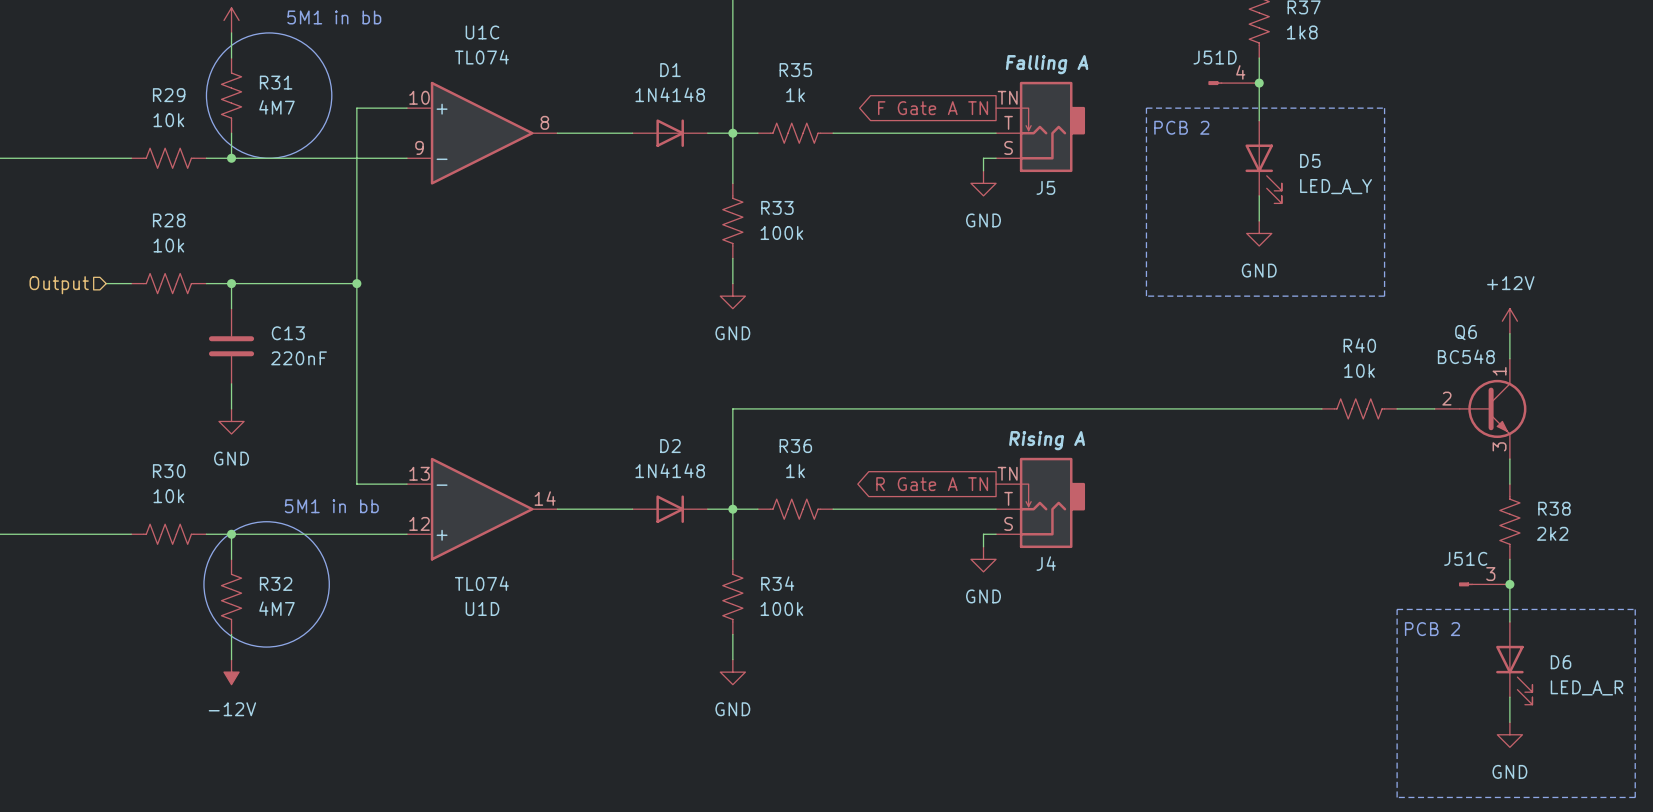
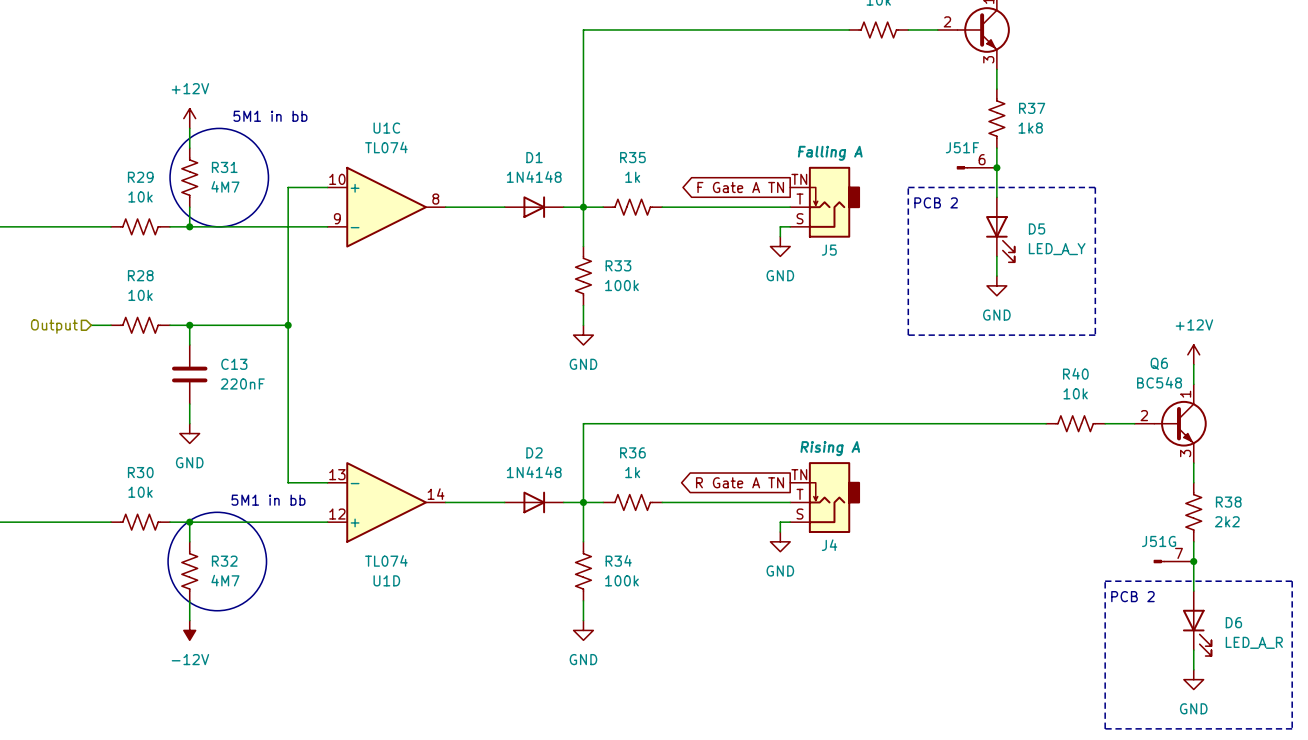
J51D name: J51D (1215, 57) -> J51F (962, 147)
J51D pin number: 4 (1240, 72) -> 6 (982, 159)
J51C name: J51C (1465, 558) -> J51G (1159, 541)
J51C pin number: 3 (1490, 574) -> 7 (1178, 553)

